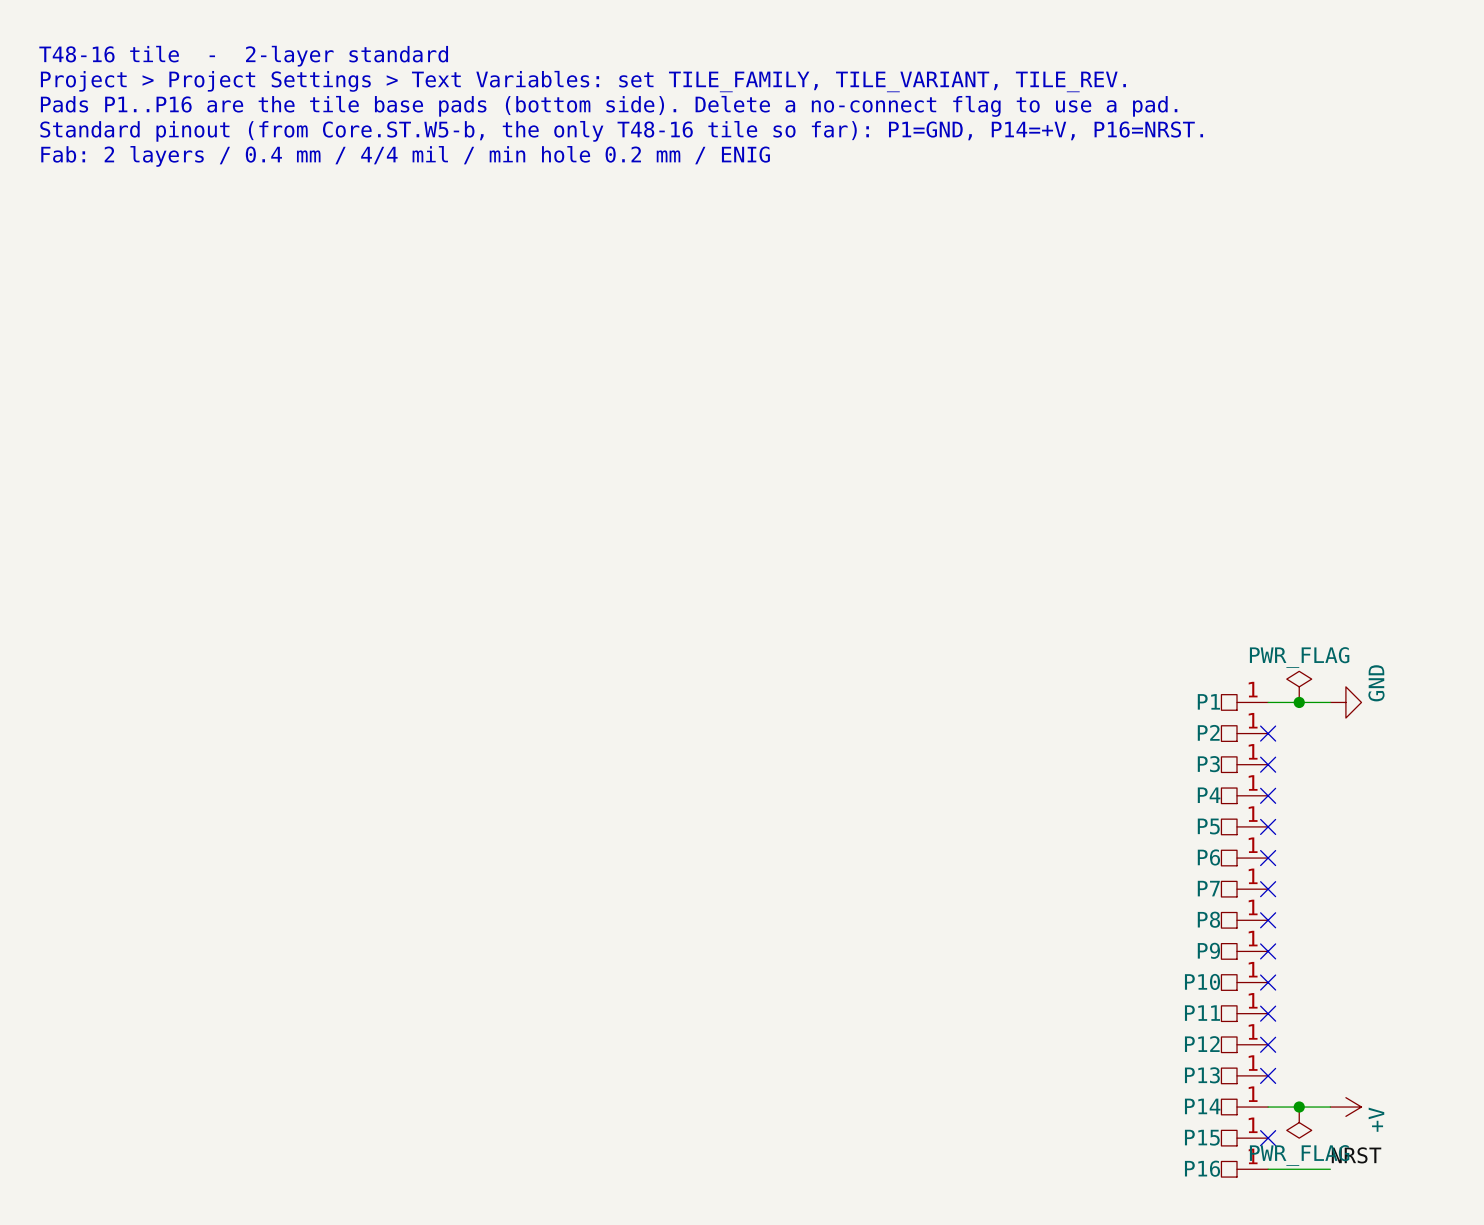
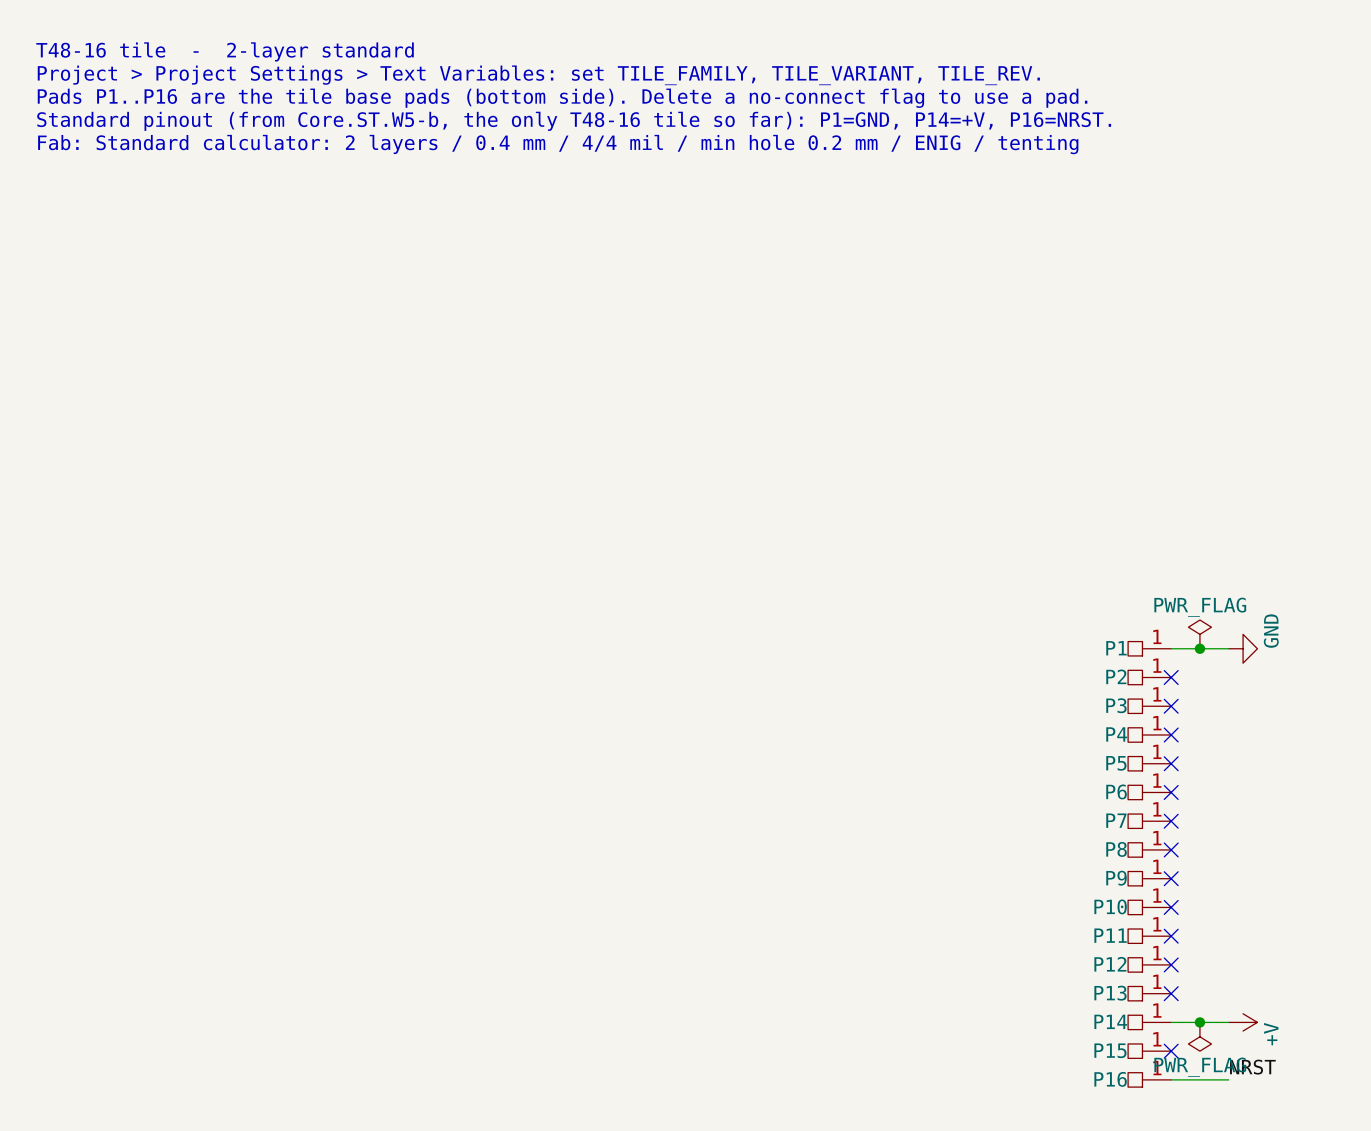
text: Fab: 2 layers / 0.4 mm / 4/4 mil / min hole 0.2 mm / ENIG (405, 156) -> Fab: Standard calculator: 2 layers / 0.4 mm / 4/4 mil / min hole 0.2 mm / ENIG / tenting (558, 144)

